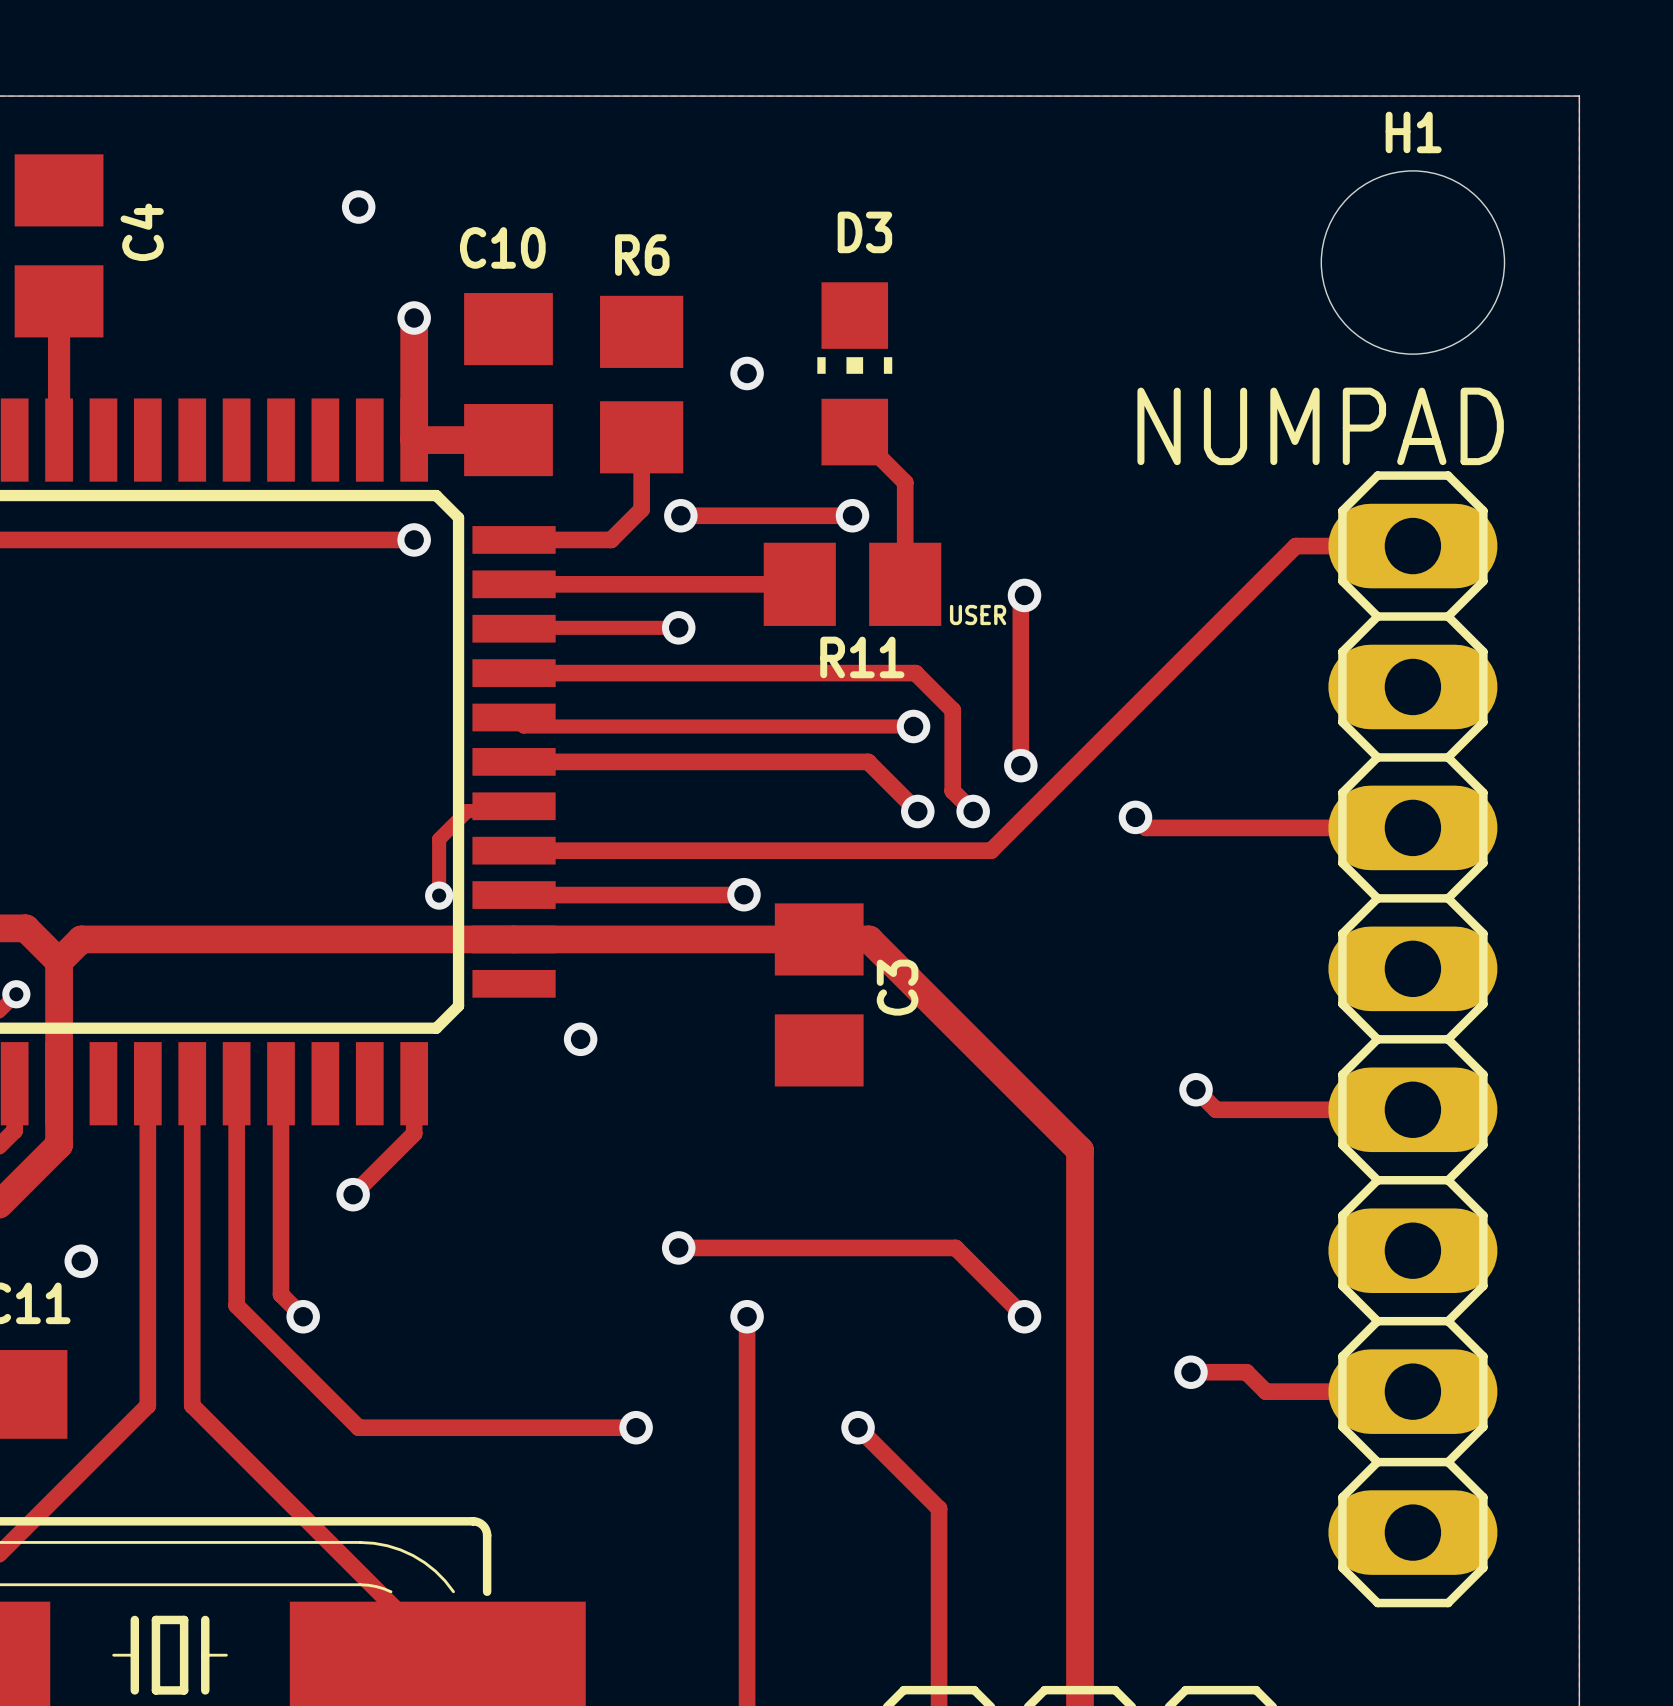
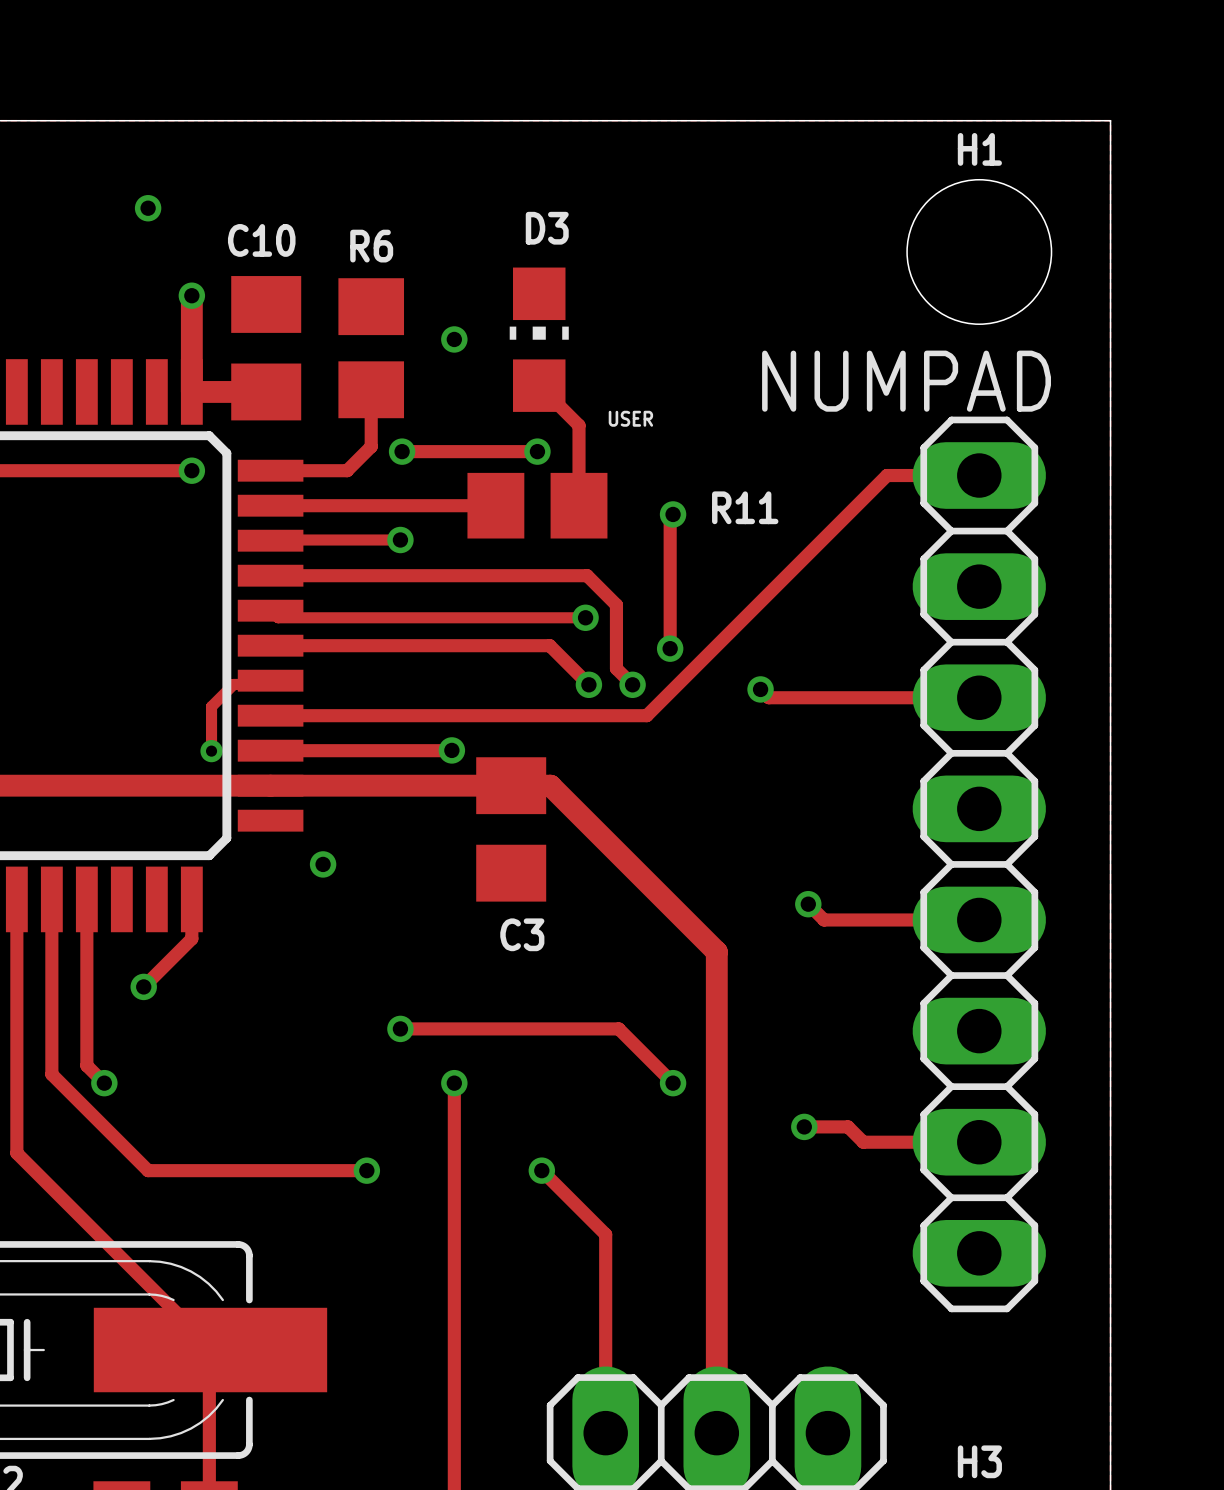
text position: USER (978, 614) -> USER (630, 418)
R11 name position: R11 (862, 657) -> R11 (745, 507)
C3 name rotation: 0° (897, 987) -> 90° clockwise (522, 934)
C3 name position: C3 (897, 987) -> C3 (522, 934)

